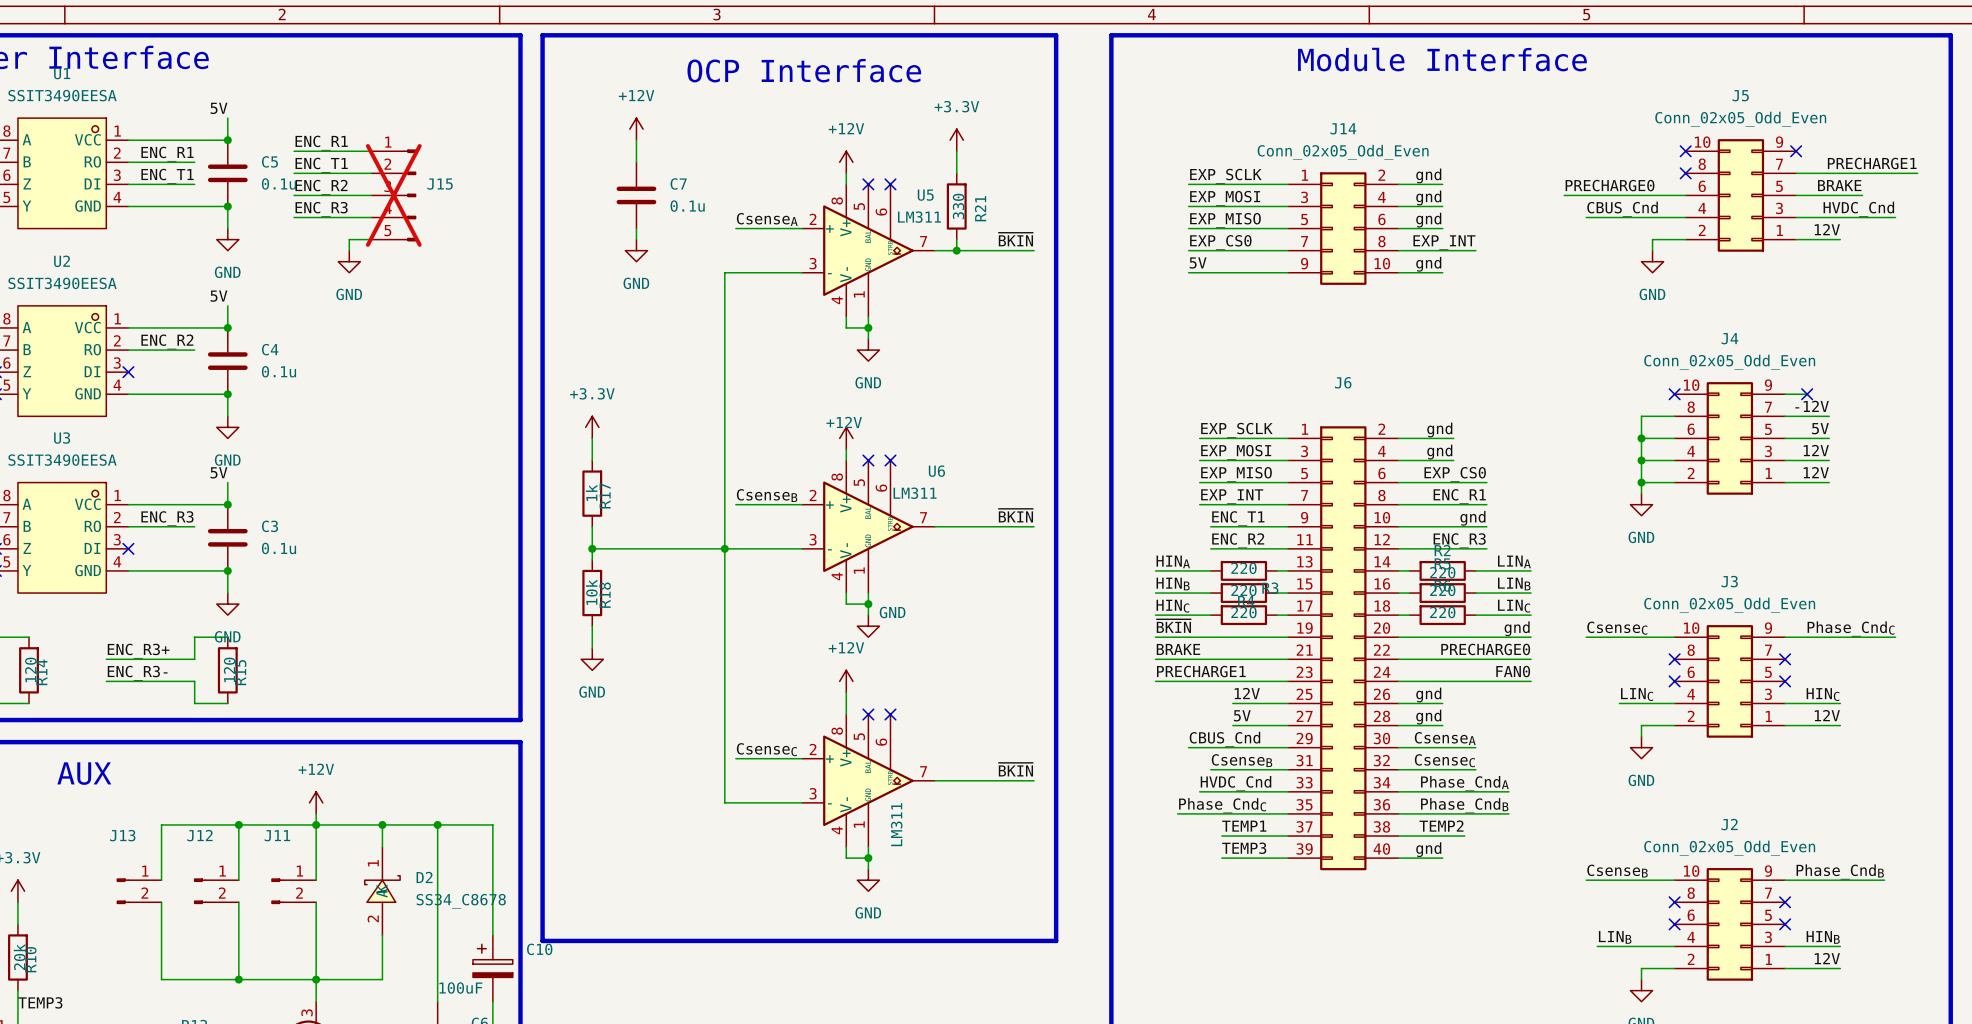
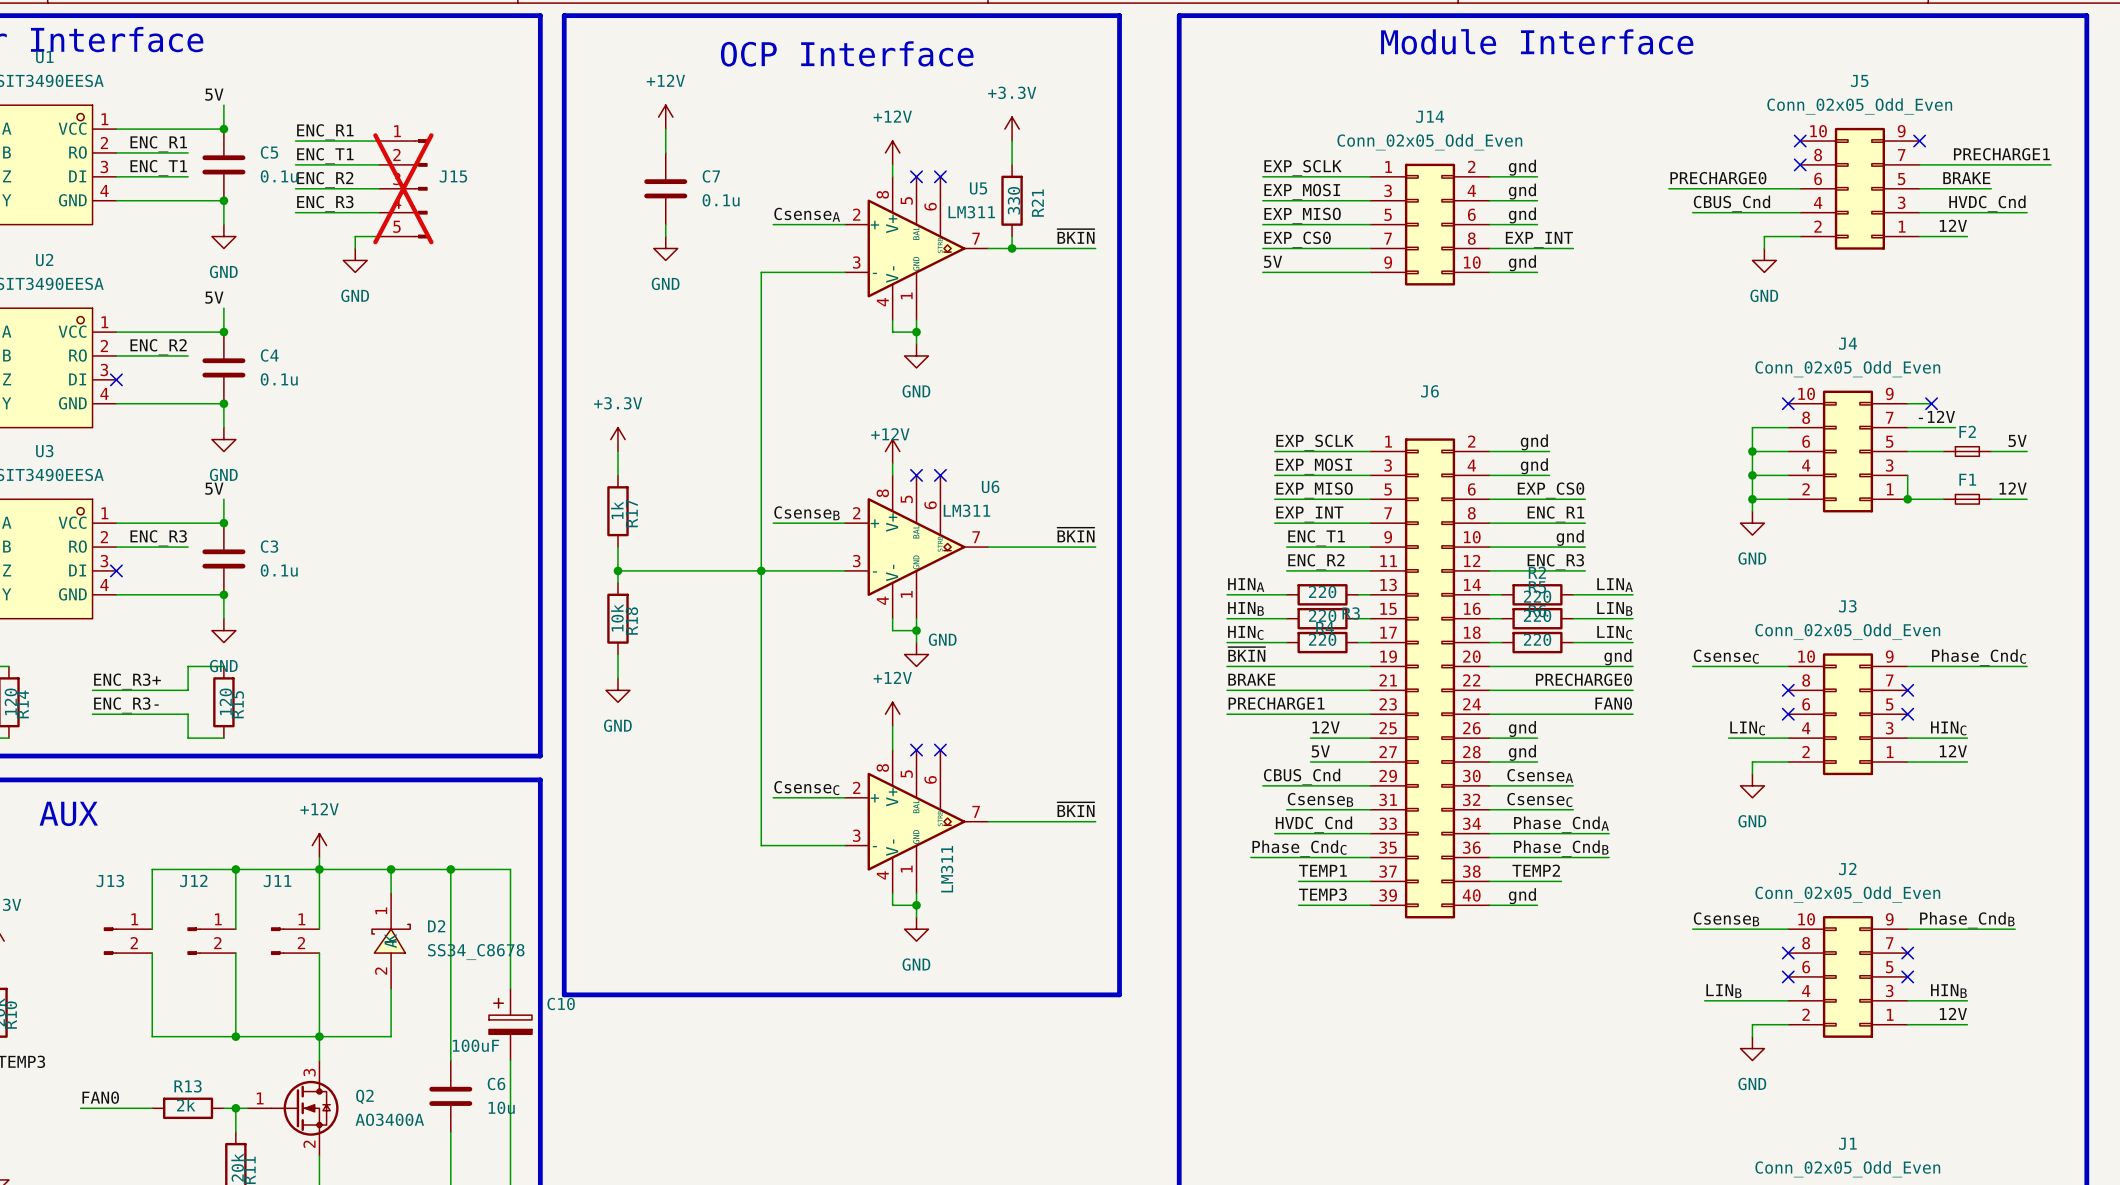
label position: 5V (1820, 428) -> 5V (2017, 440)
F2: none -> (1967, 451)
wire: none -> (1991, 451) (2027, 451)
label: 12V (1816, 450) -> none
wire: (1785, 460) (1829, 460) -> (1907, 475) (1907, 499)
label: 12V (1816, 472) -> none
label: none -> 12V (2013, 488)
junction: none -> (1907, 499)
F1: none -> (1967, 499)
wire: none -> (1991, 499) (2027, 499)

